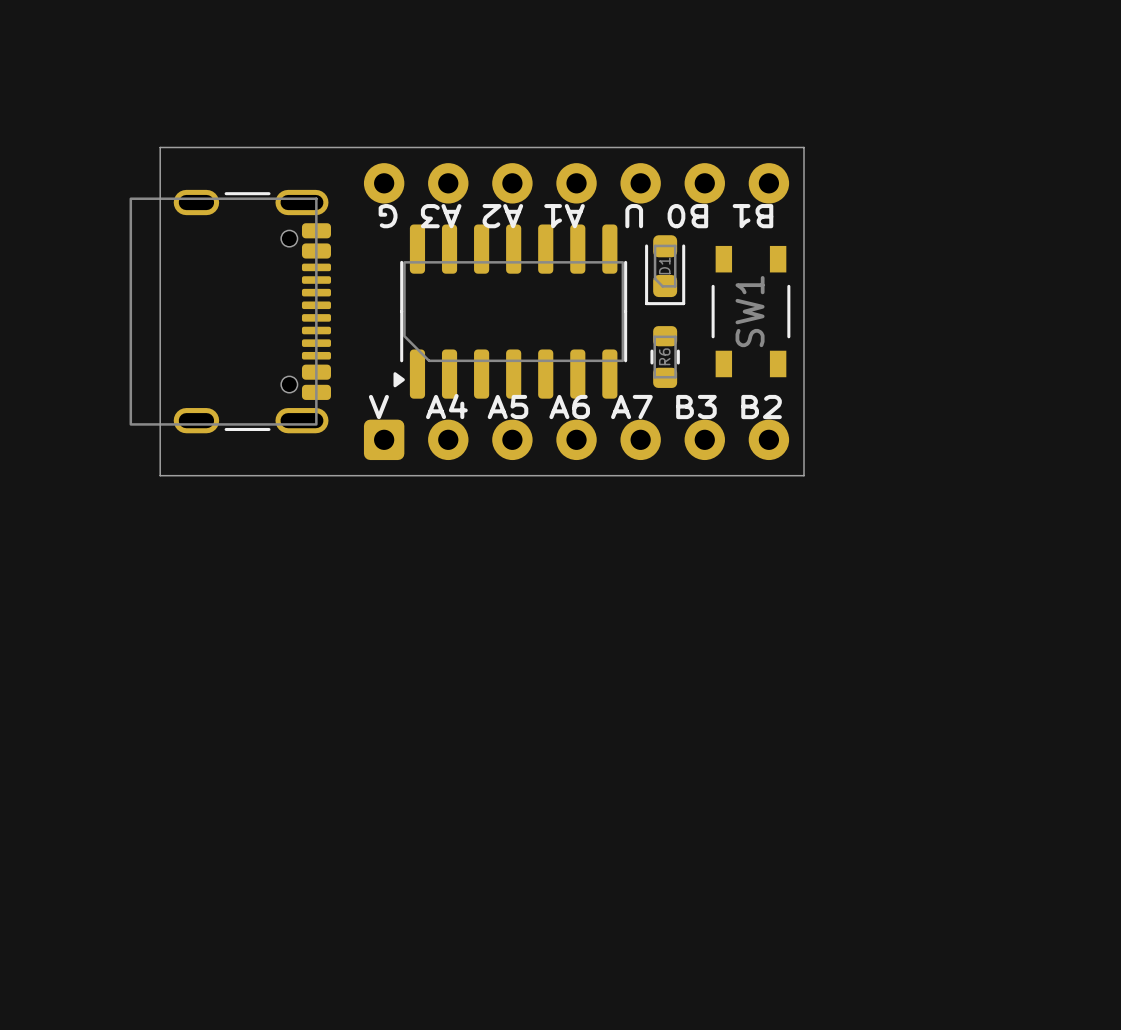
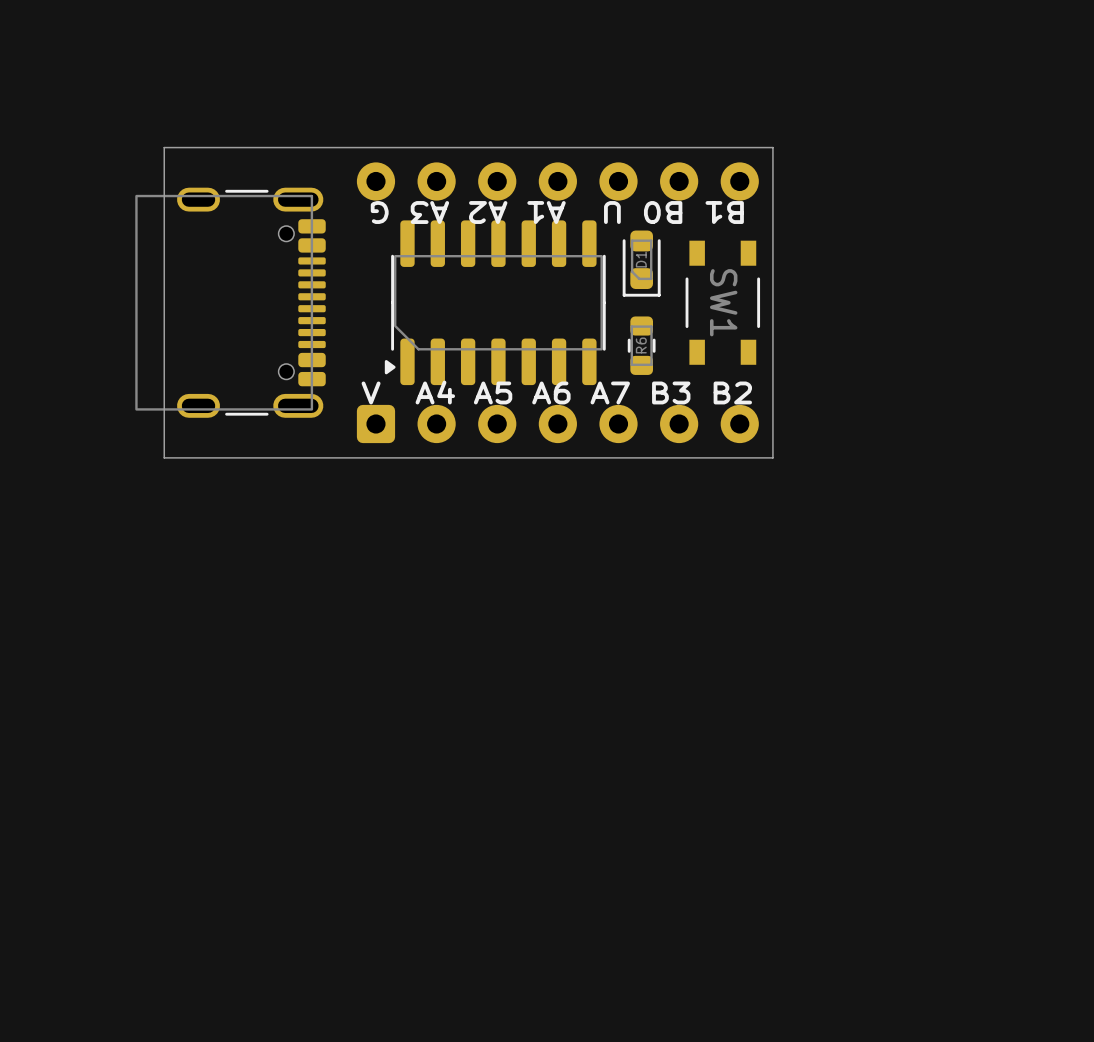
SW1 name rotation: 0° (750, 311) -> 180° (723, 302)

